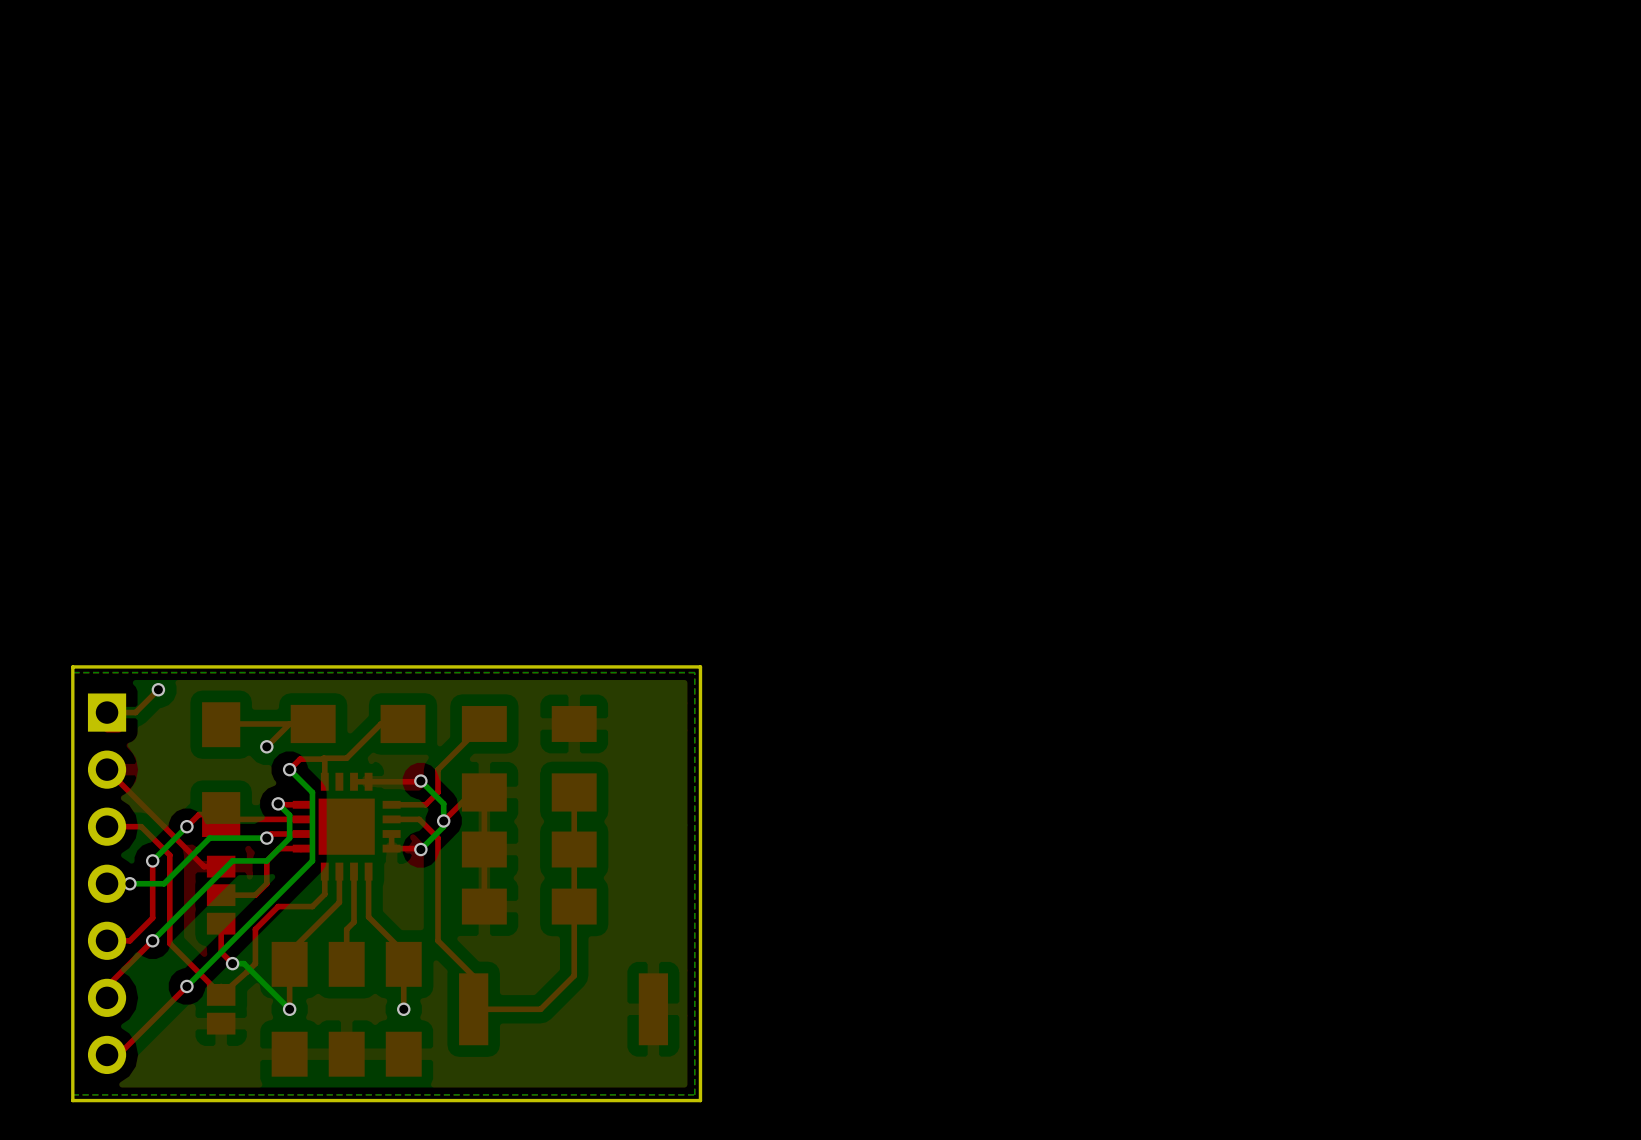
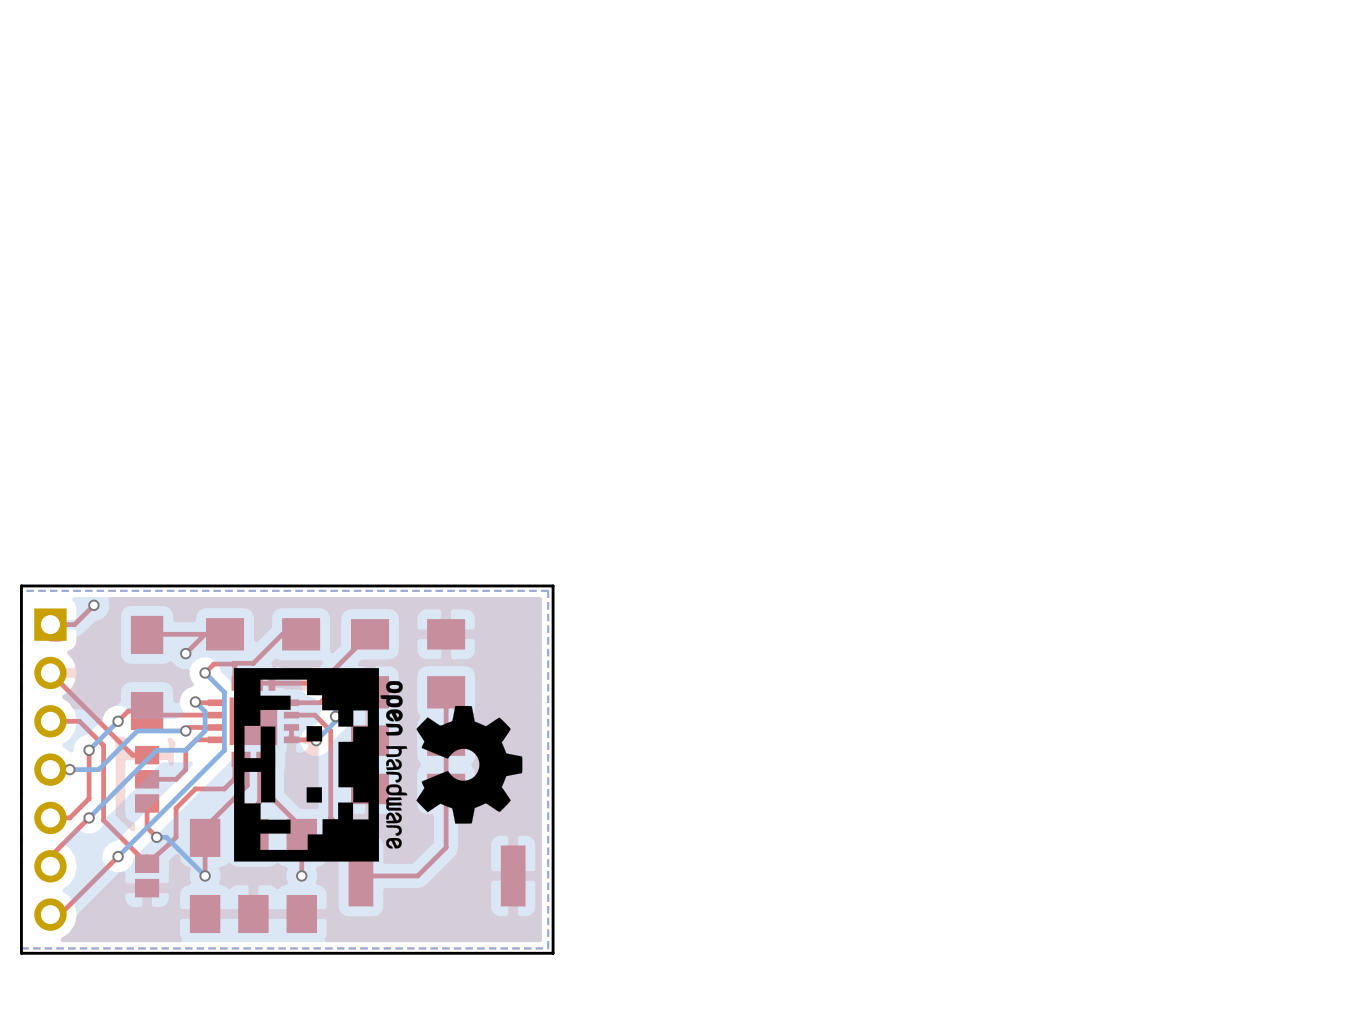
drawing: none -> [233, 668, 523, 862]

